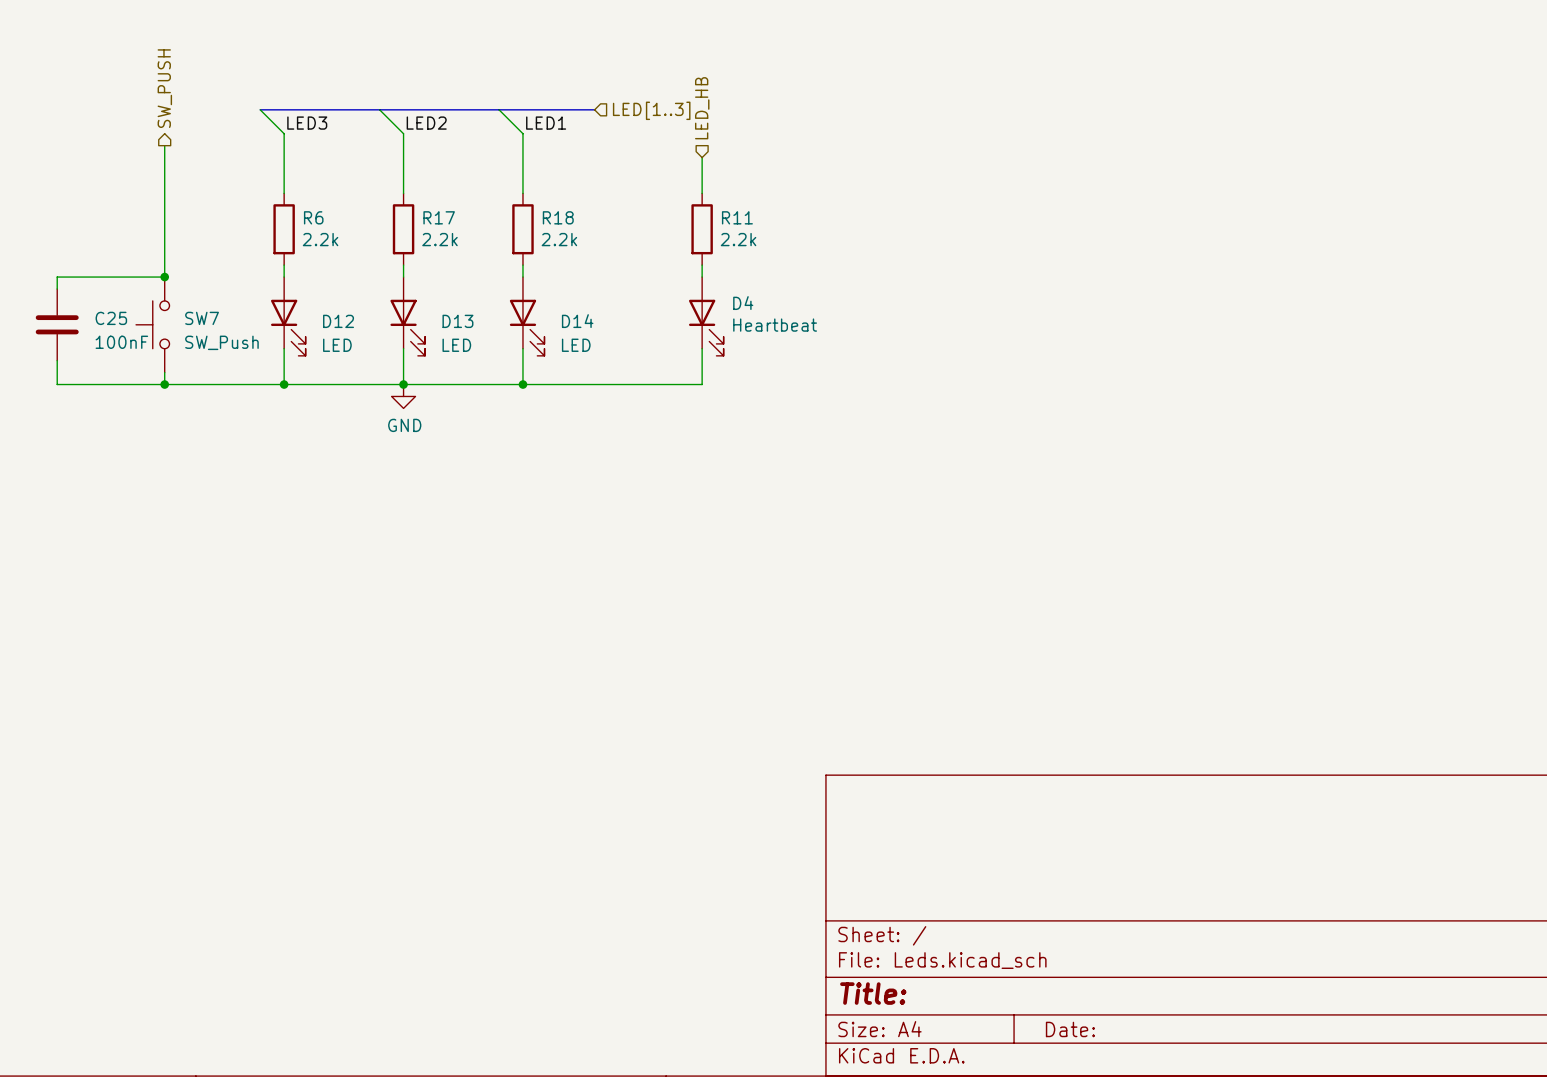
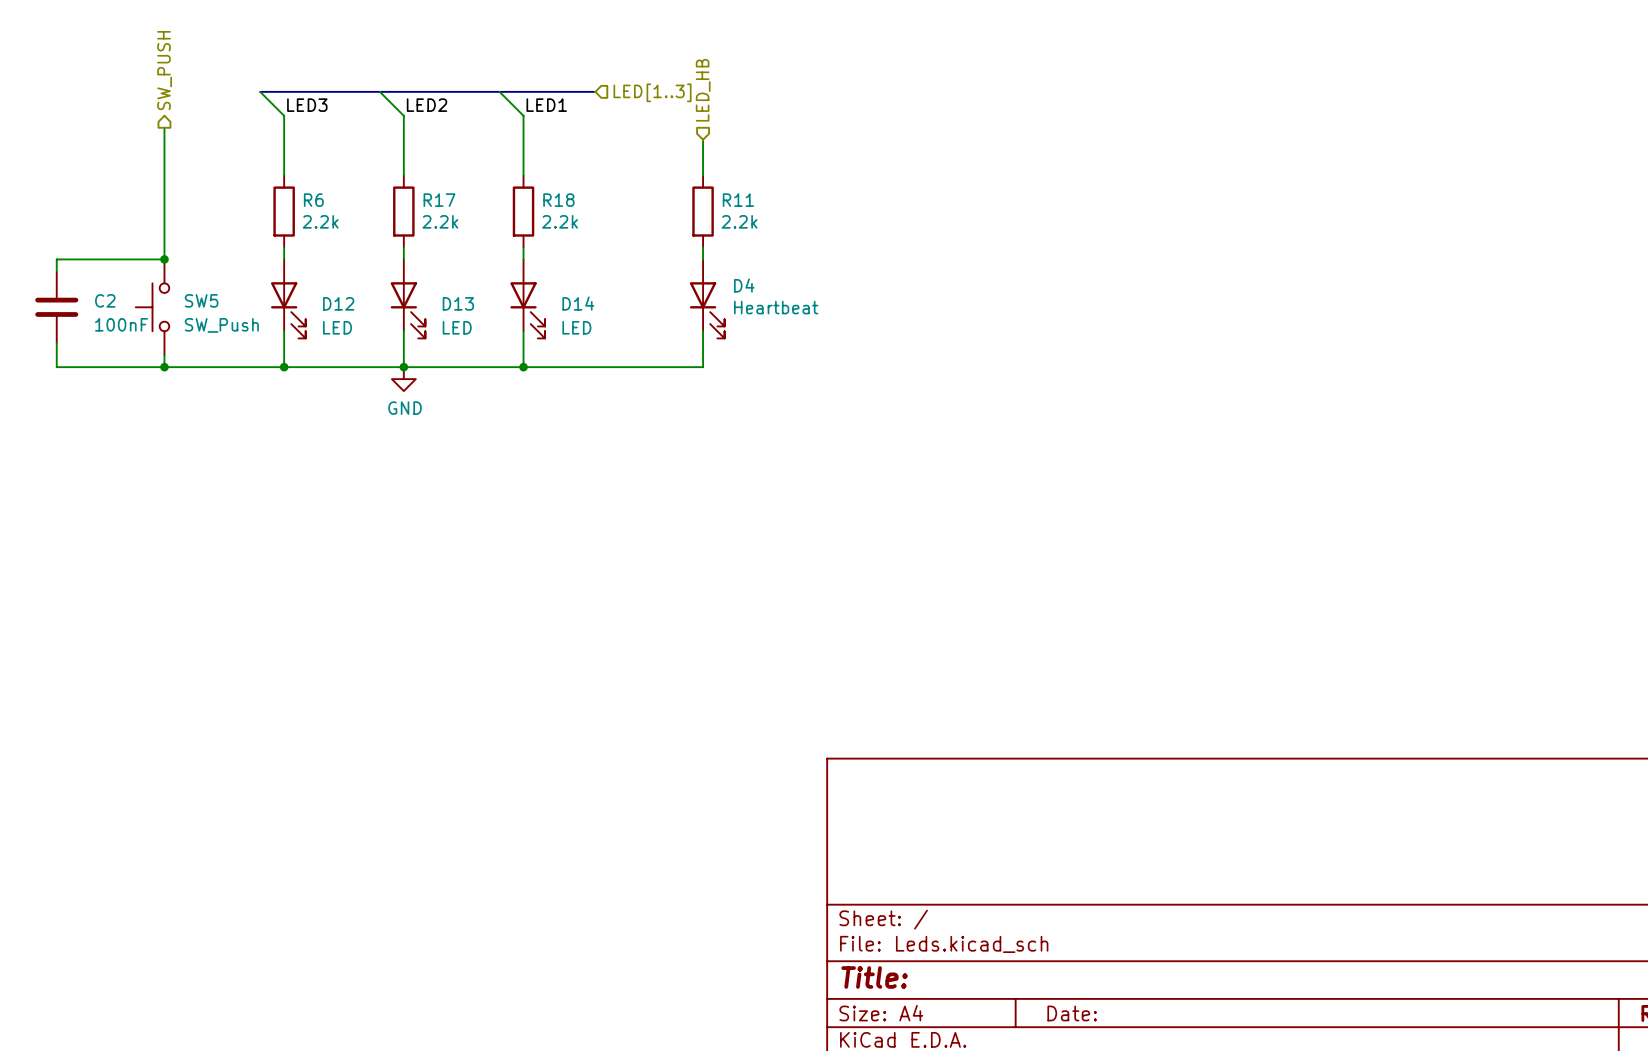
C25 name: C25 (111, 318) -> C2 (105, 300)
SW7 name: SW7 (202, 318) -> SW5 (201, 300)

